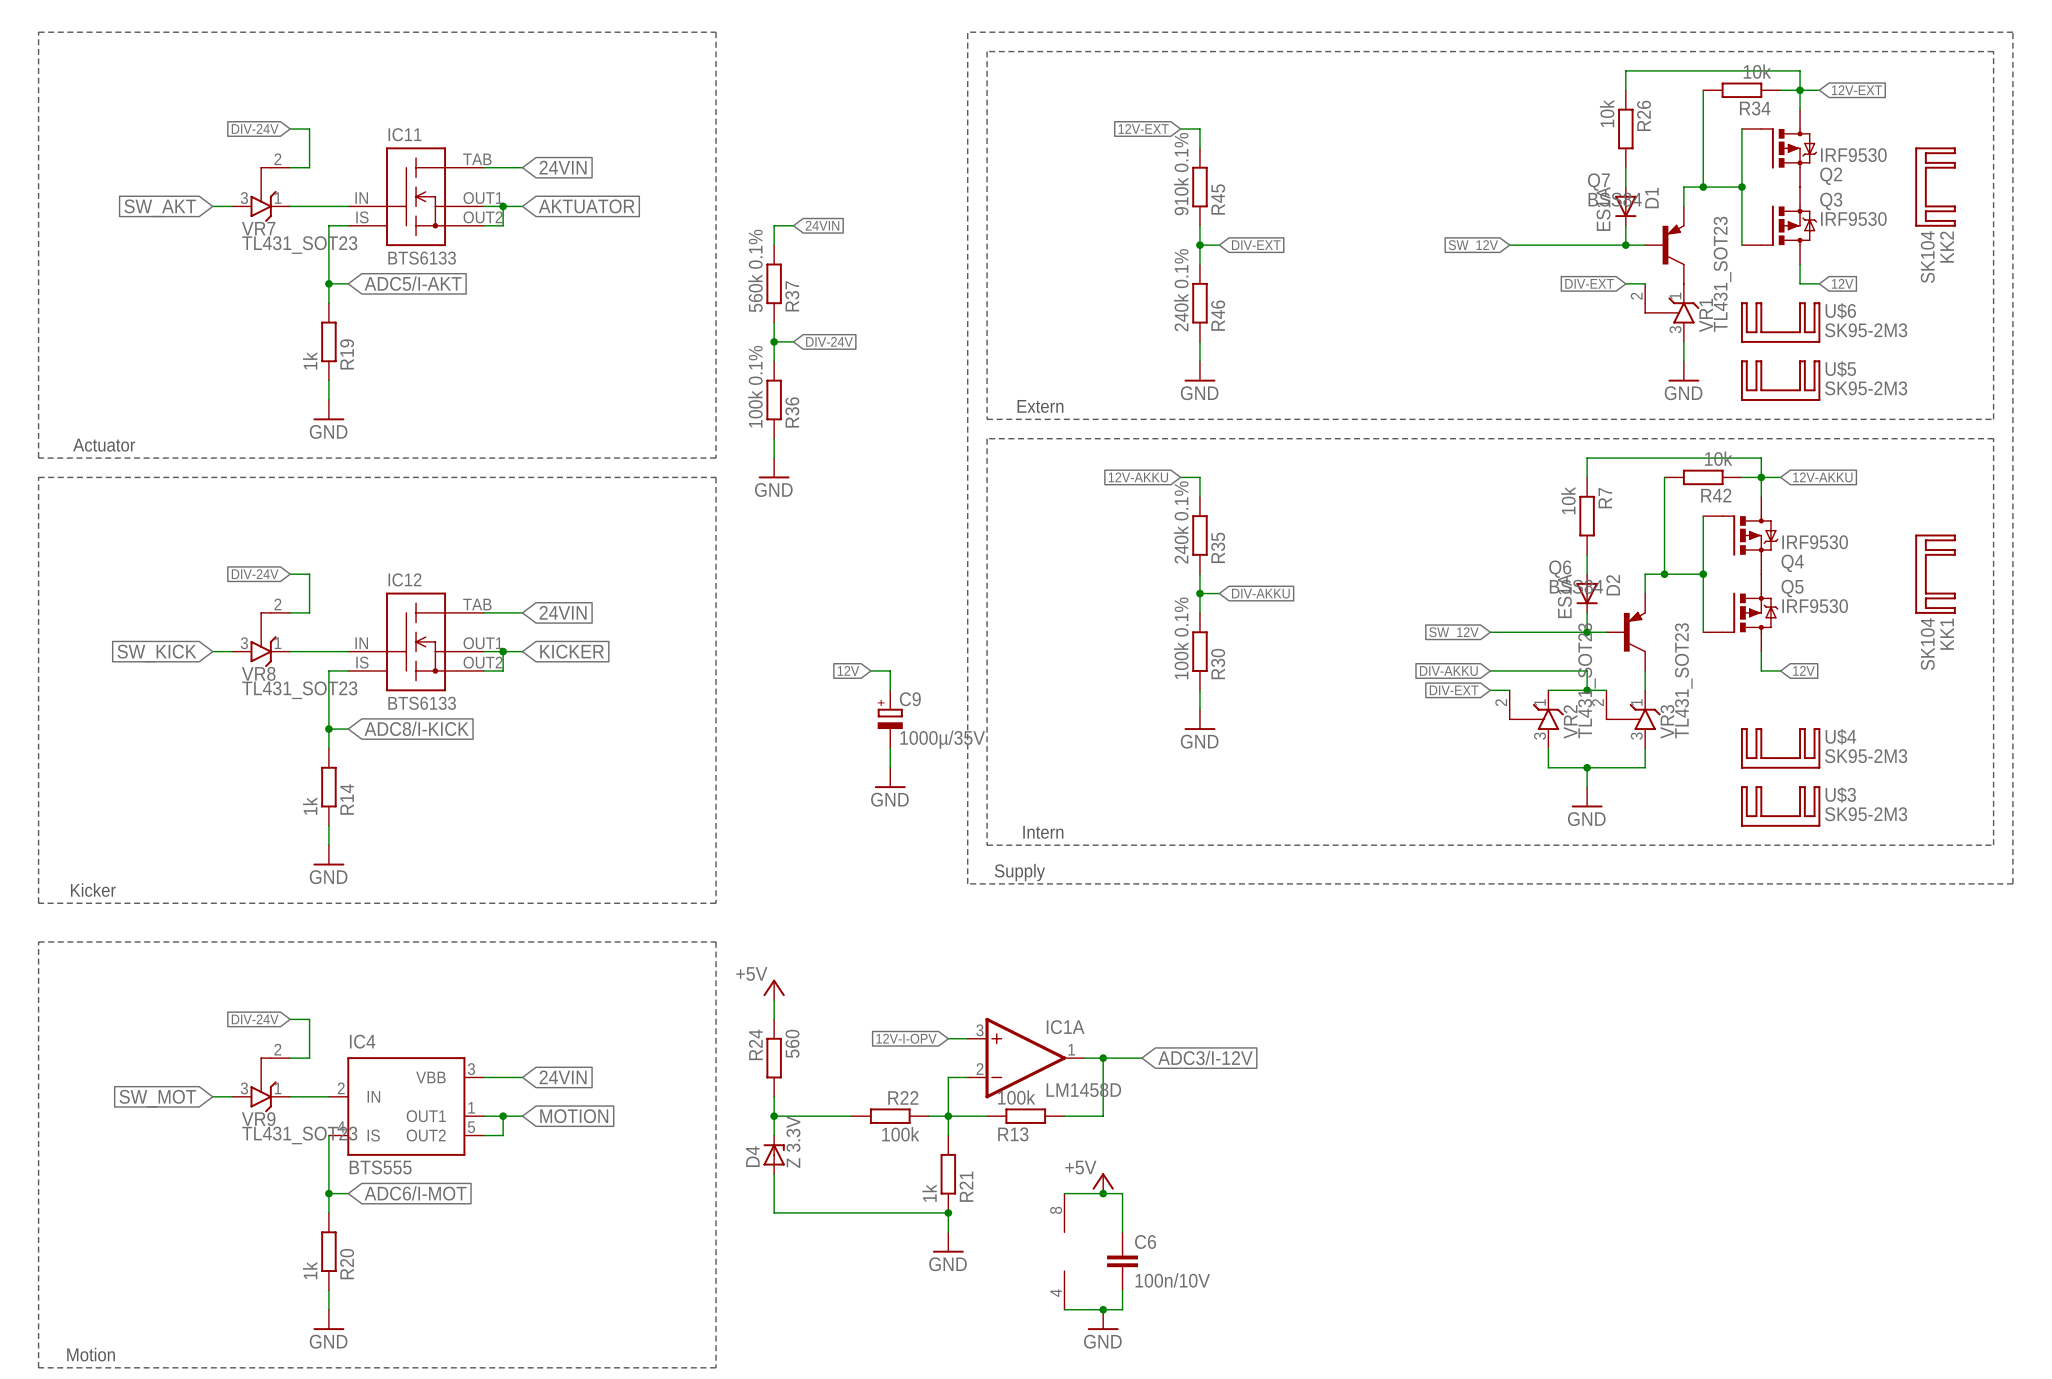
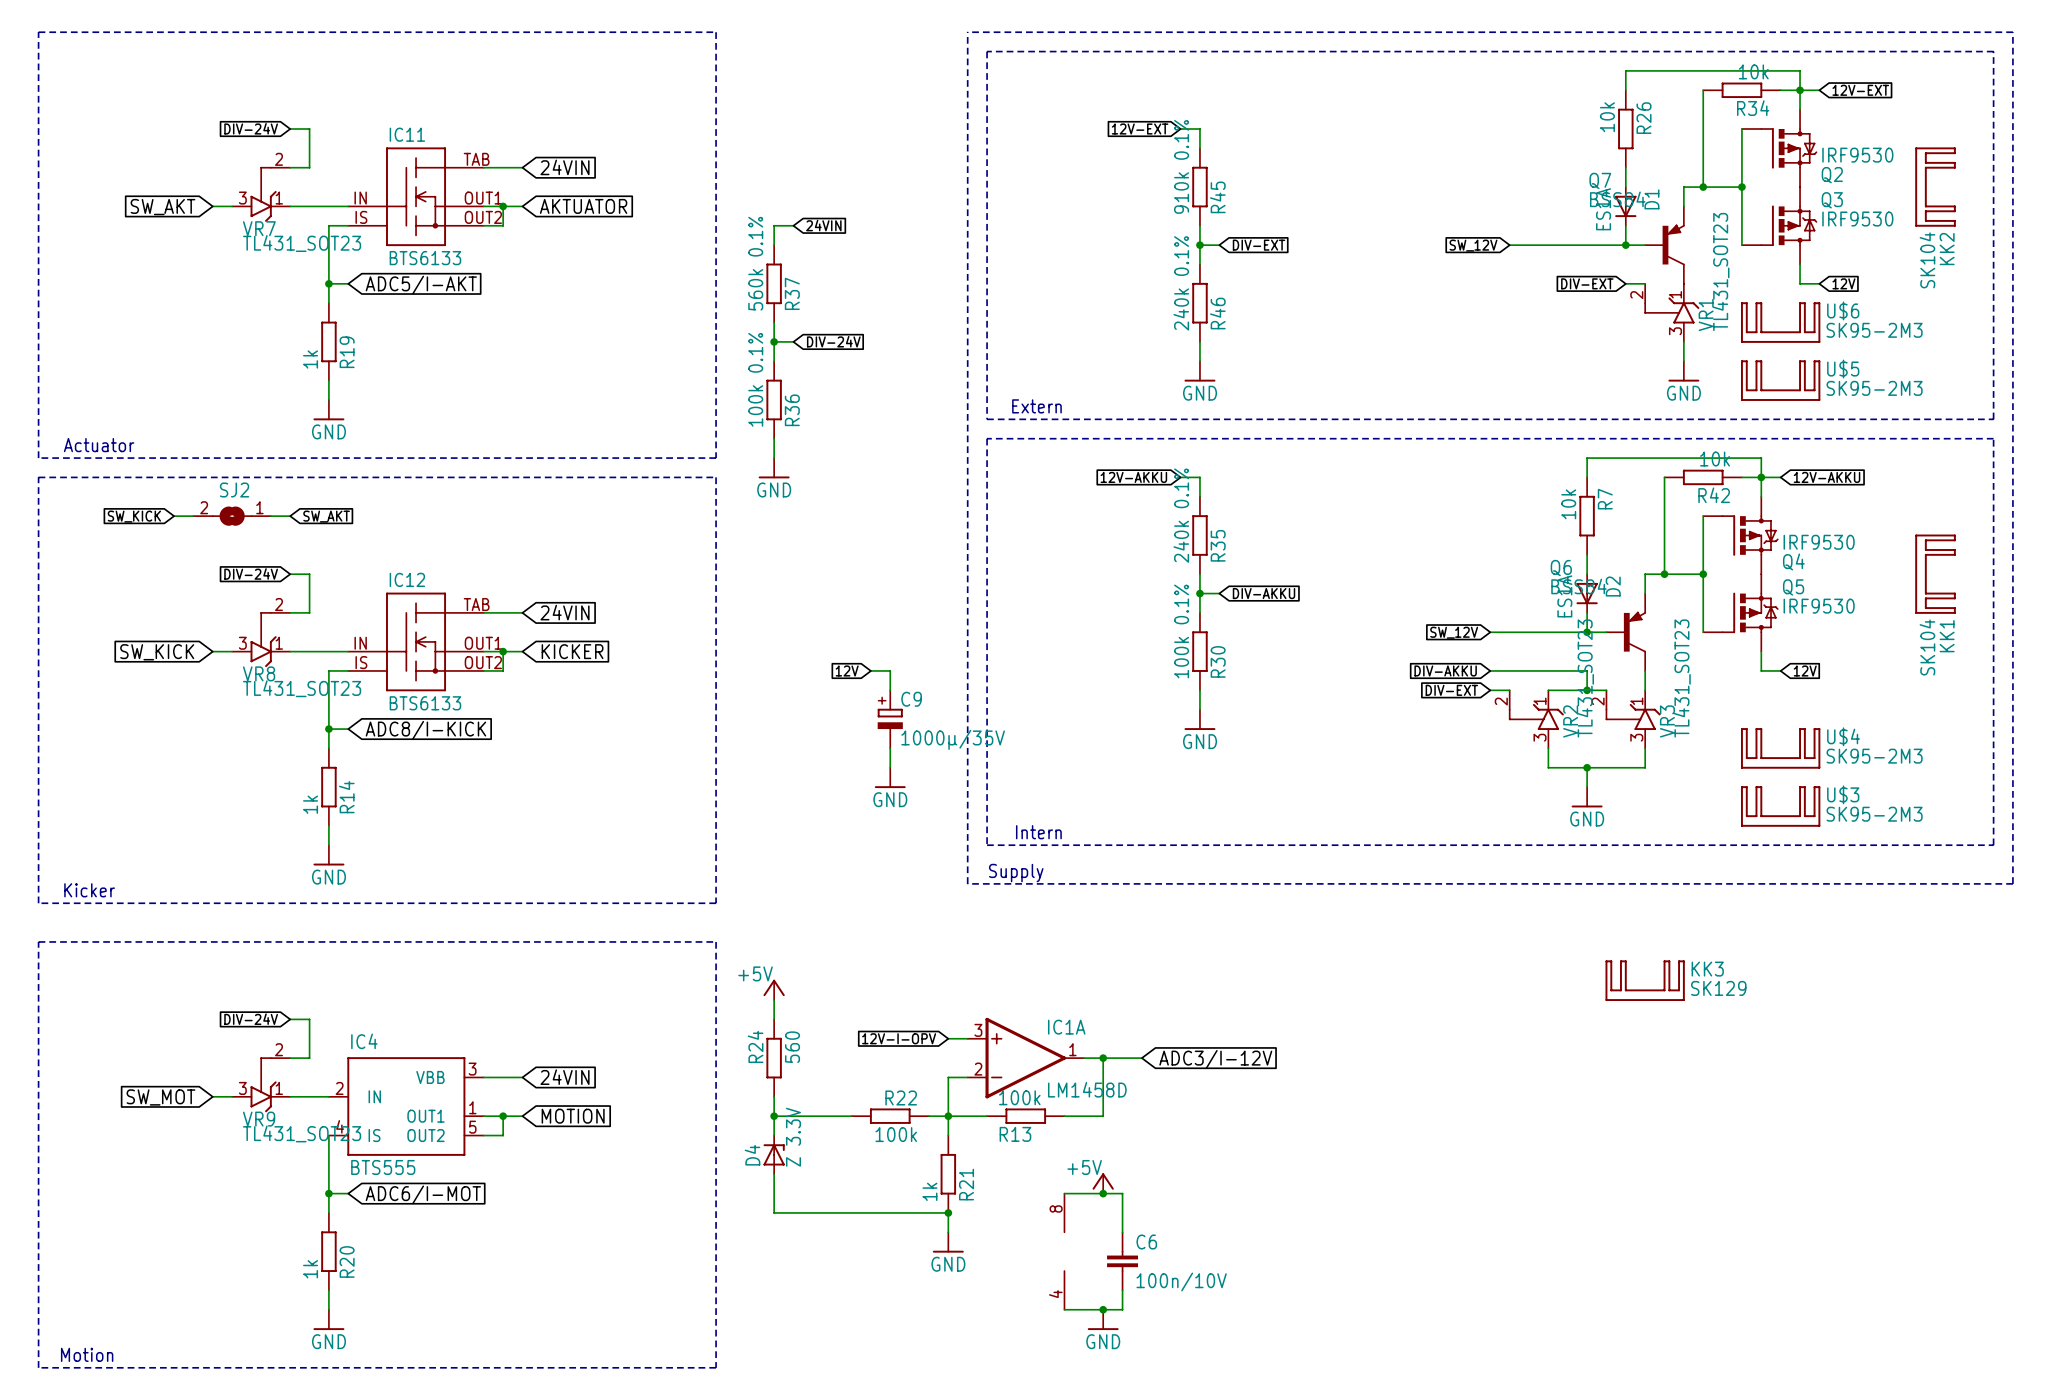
wire: none -> (174, 516) (193, 516)
SJ2: none -> (232, 516)
wire: none -> (270, 516) (290, 516)
global label: none -> SW_KICK (134, 516)
global label: none -> SW_AKT (326, 516)
KK3: none -> SK129 (1645, 980)

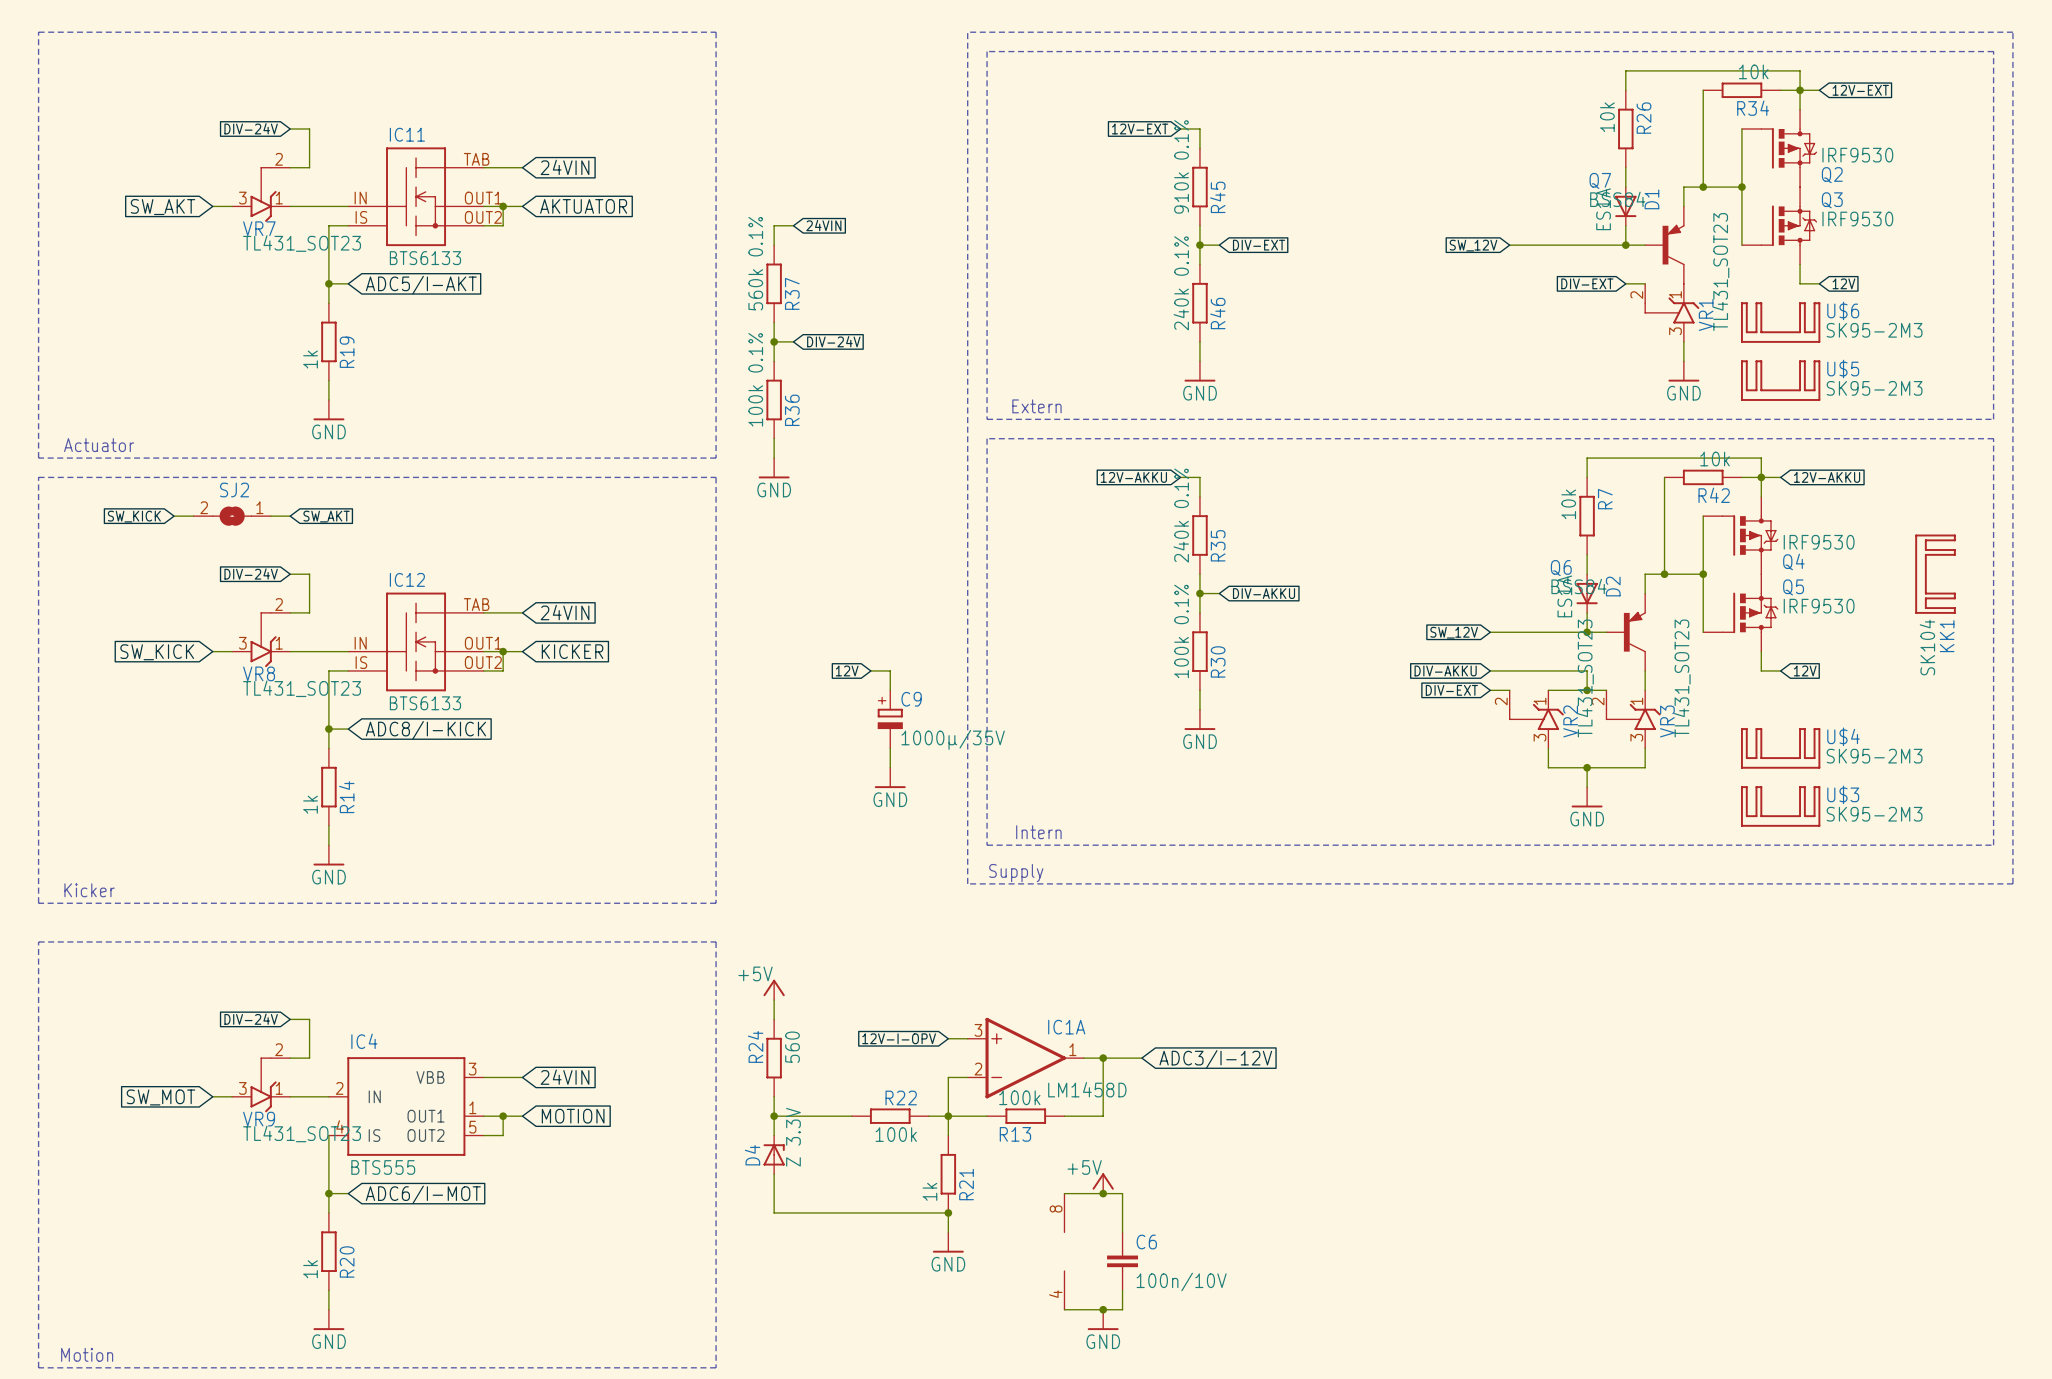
KK2: SK104 (1935, 187) -> none
KK3: SK129 (1645, 980) -> none

